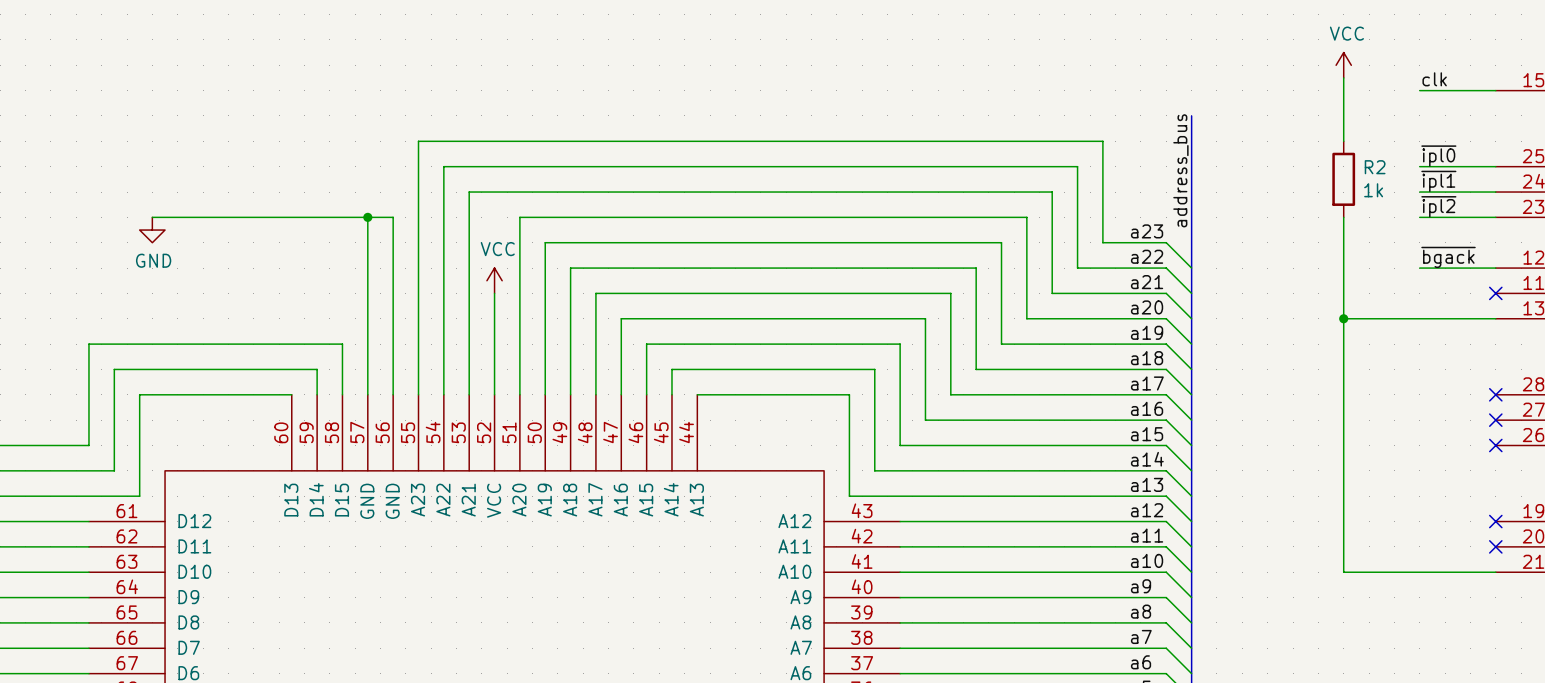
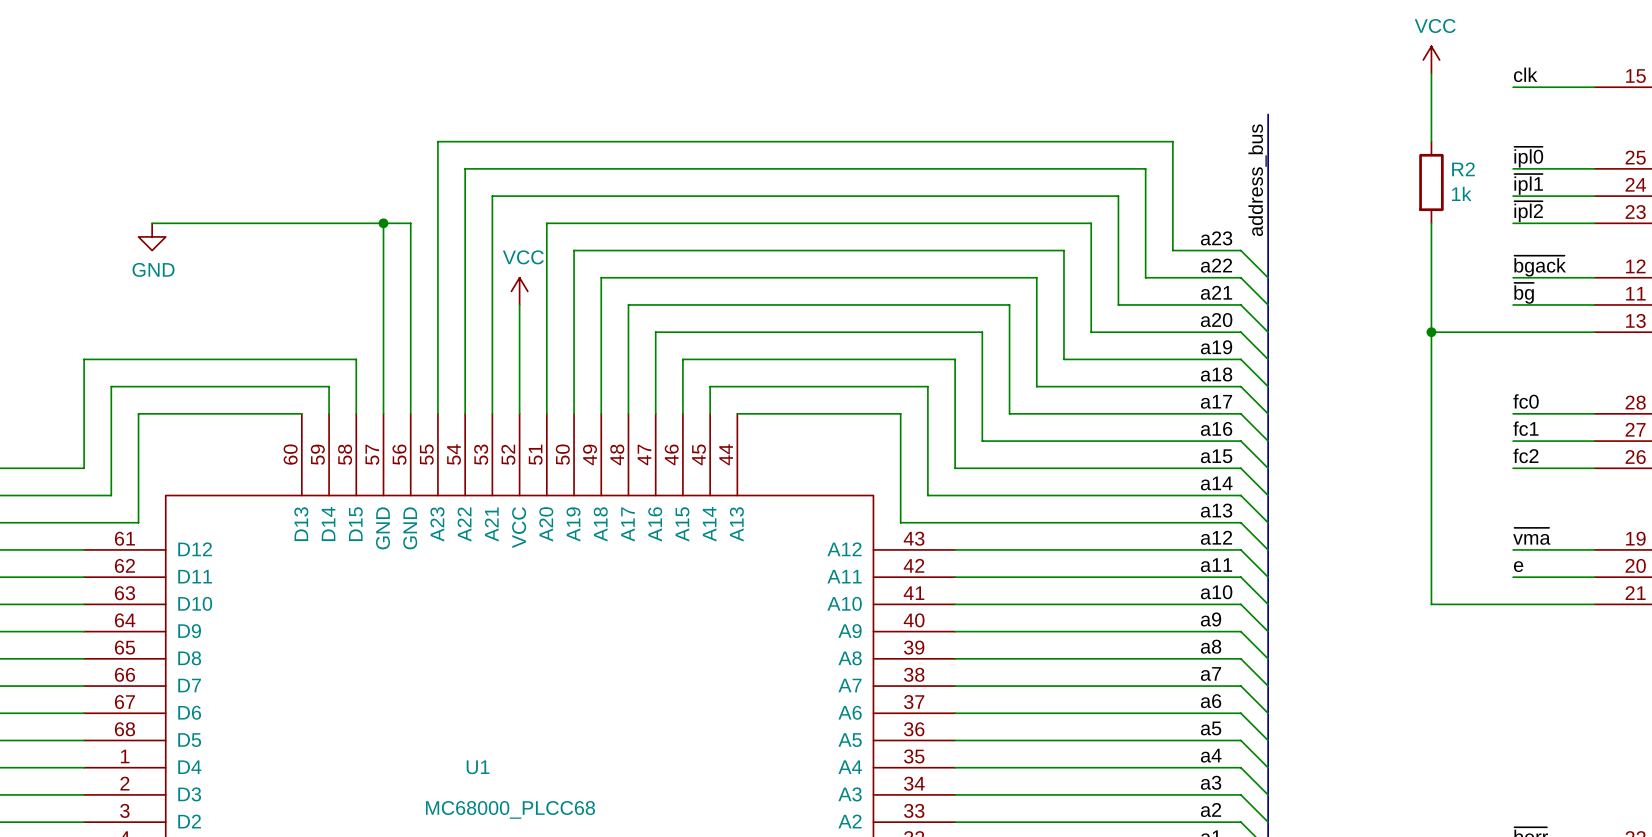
label: none -> ~{bg} (1524, 293)
wire: none -> (1513, 304) (1594, 304)
no-connect mark: (1495, 293) -> none
label: none -> fc0 (1526, 401)
wire: none -> (1513, 413) (1594, 413)
no-connect mark: (1495, 394) -> none
label: none -> fc1 (1525, 428)
wire: none -> (1513, 441) (1594, 441)
no-connect mark: (1495, 420) -> none
label: none -> fc2 (1525, 455)
wire: none -> (1513, 468) (1594, 468)
no-connect mark: (1495, 445) -> none
label: none -> ~{vma} (1531, 536)
wire: none -> (1513, 549) (1594, 549)
no-connect mark: (1495, 521) -> none
label: none -> e (1518, 566)
wire: none -> (1513, 577) (1594, 577)
no-connect mark: (1495, 546) -> none

